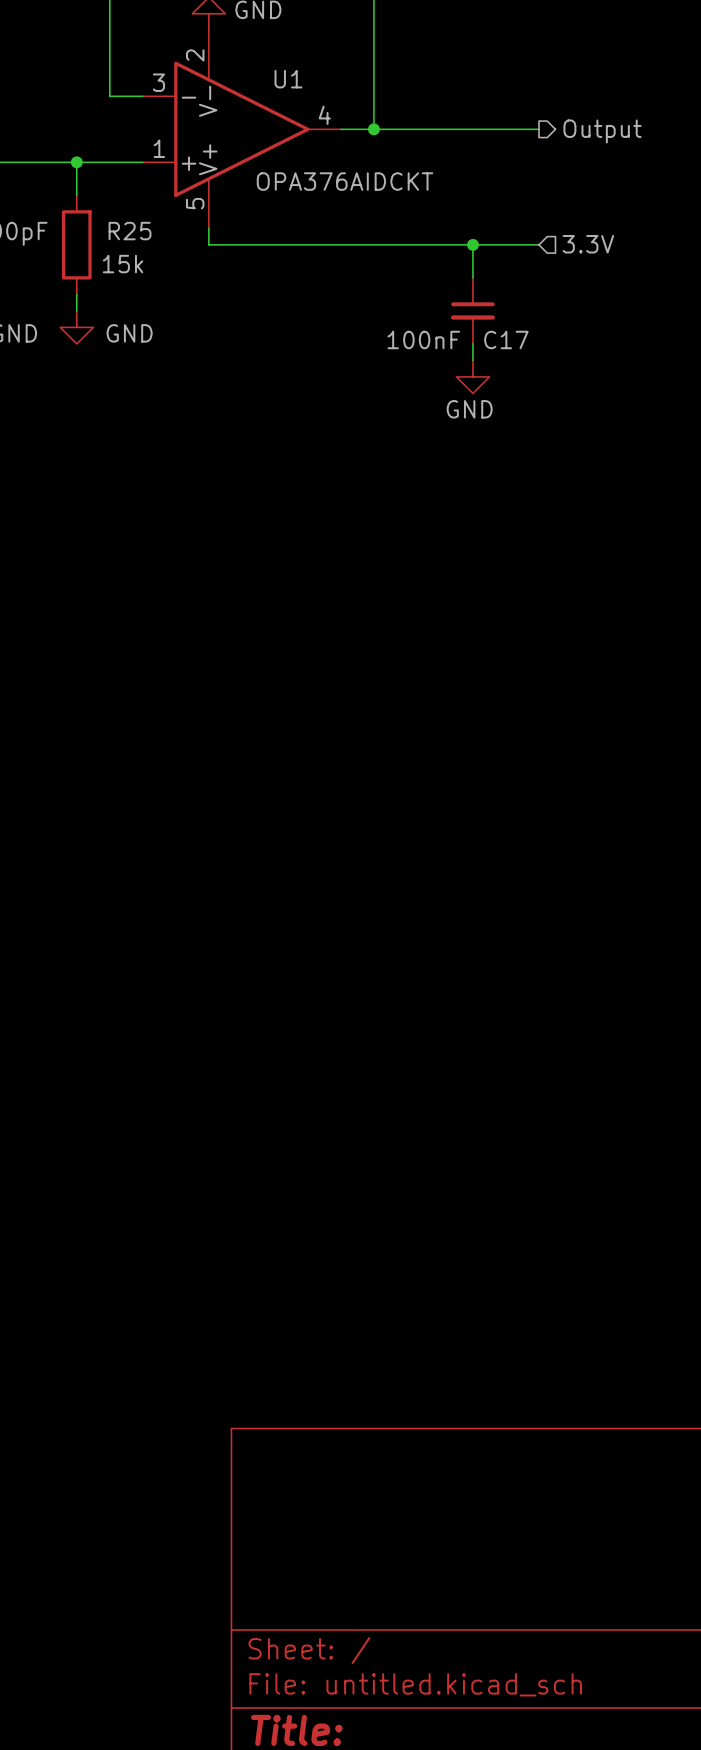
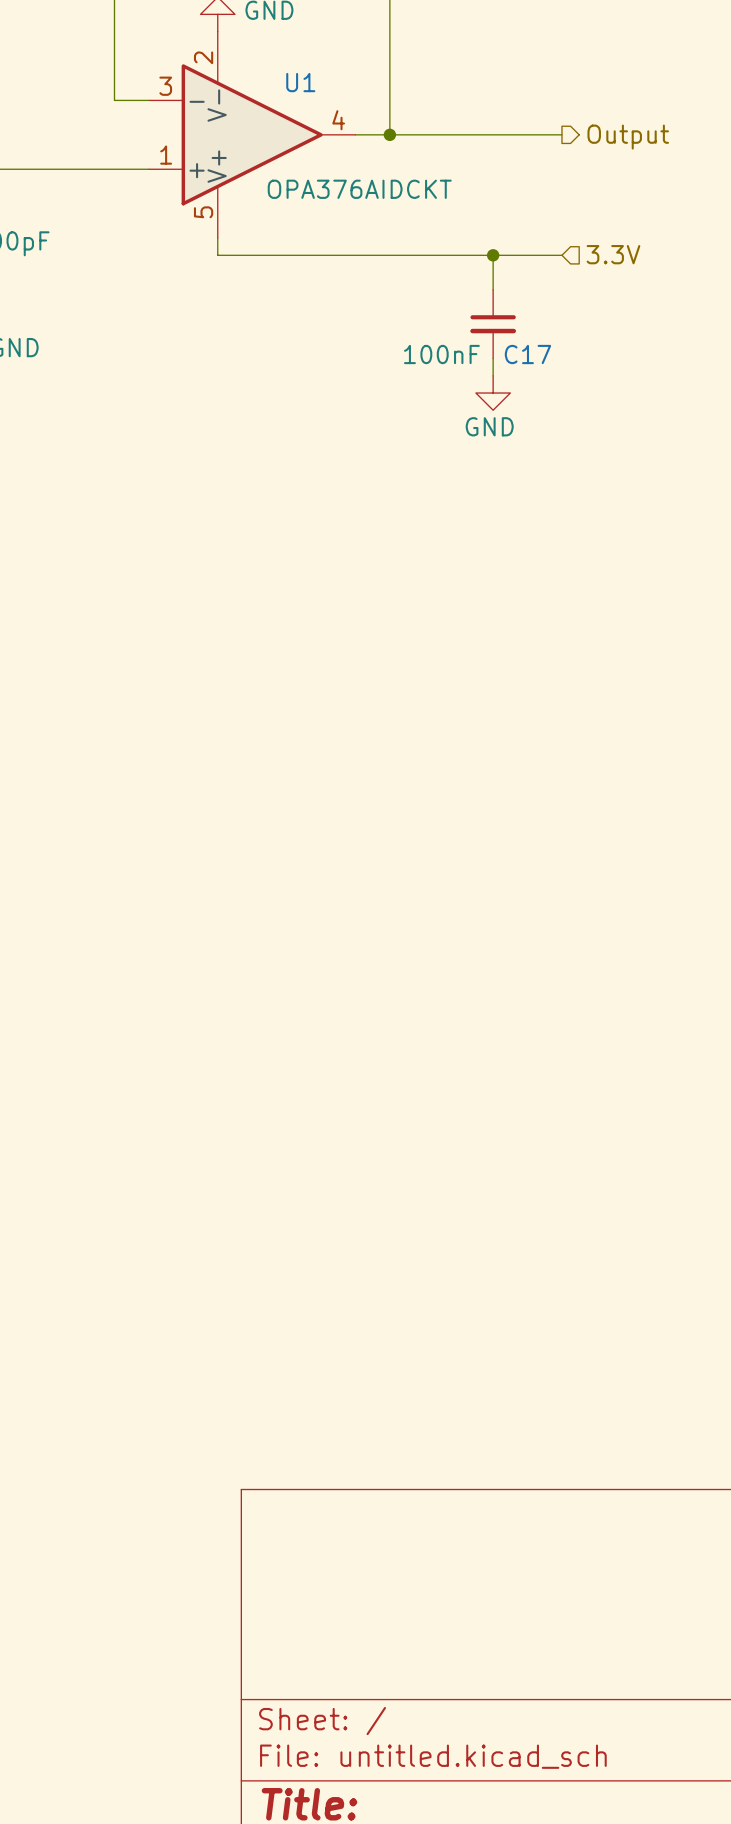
wire: (76, 162) (76, 195) -> none
junction: (76, 162) -> none
R25: 15k (76, 244) -> none
wire: (76, 294) (76, 310) -> none
power symbol: GND (76, 327) -> none

